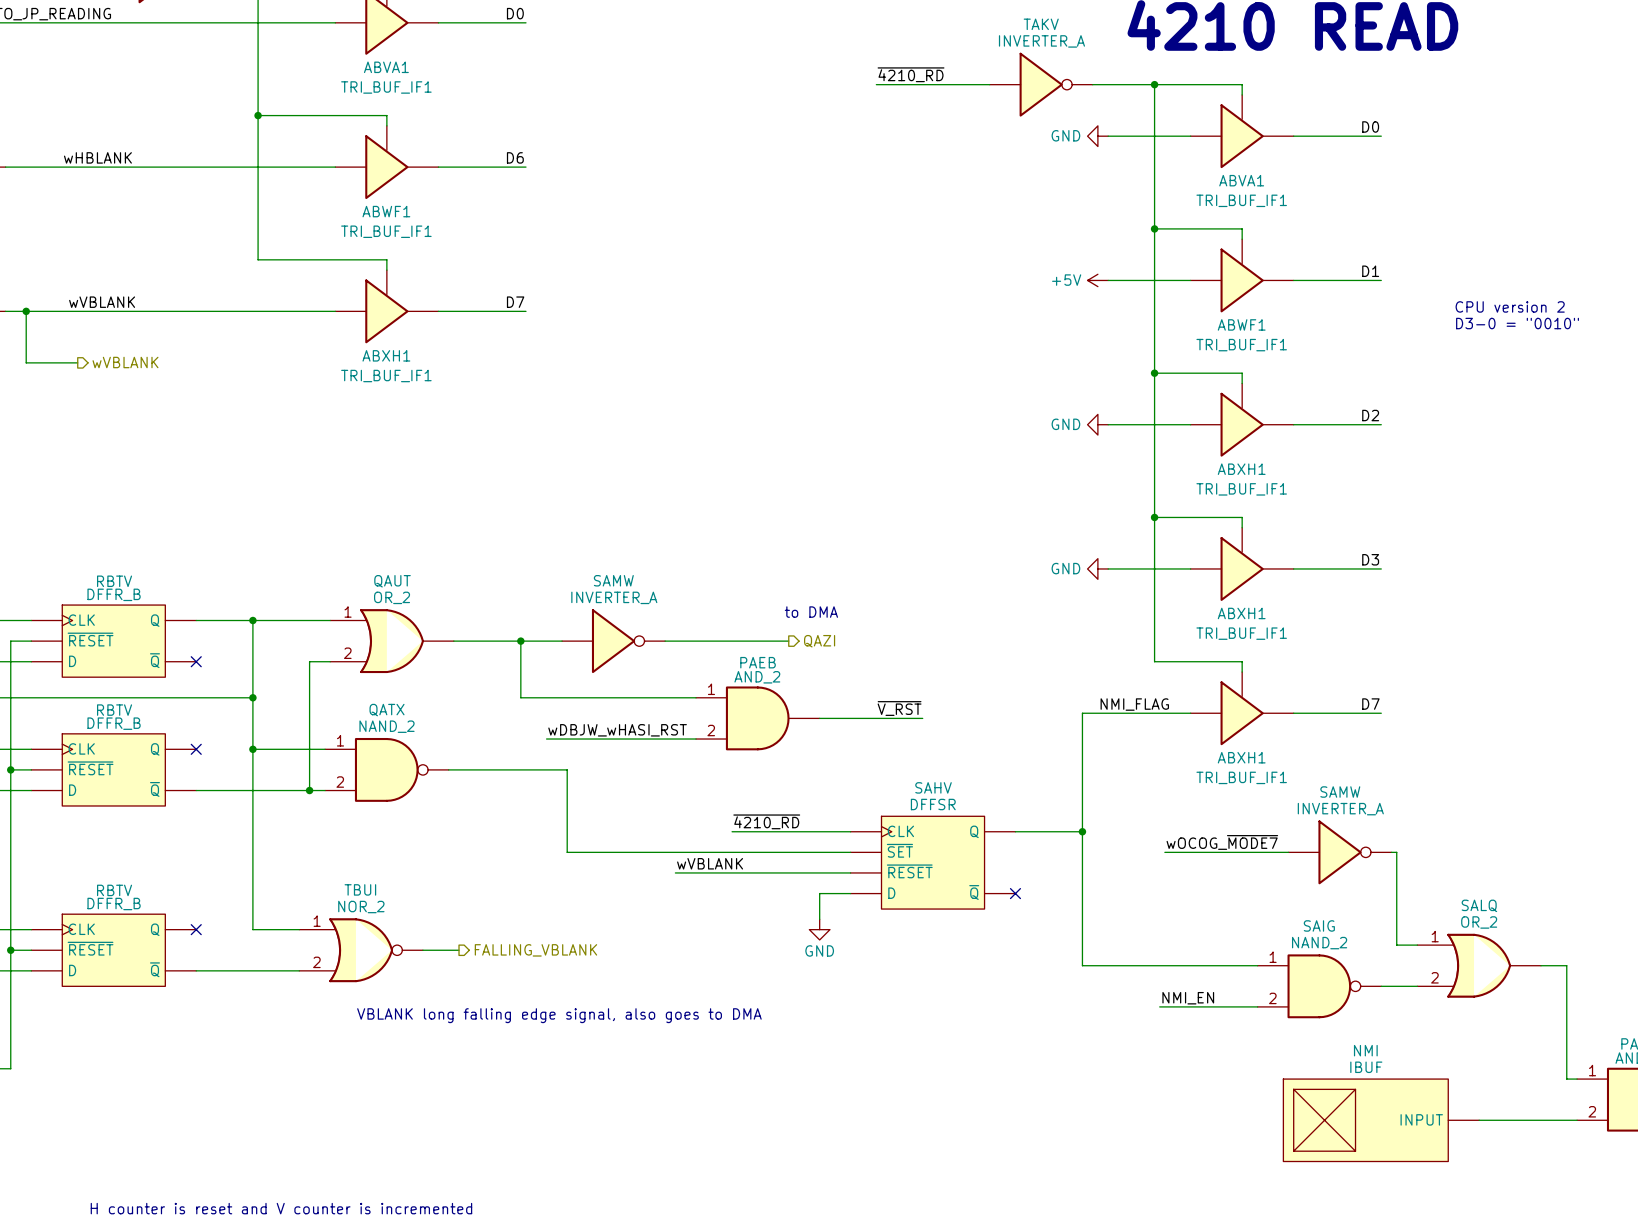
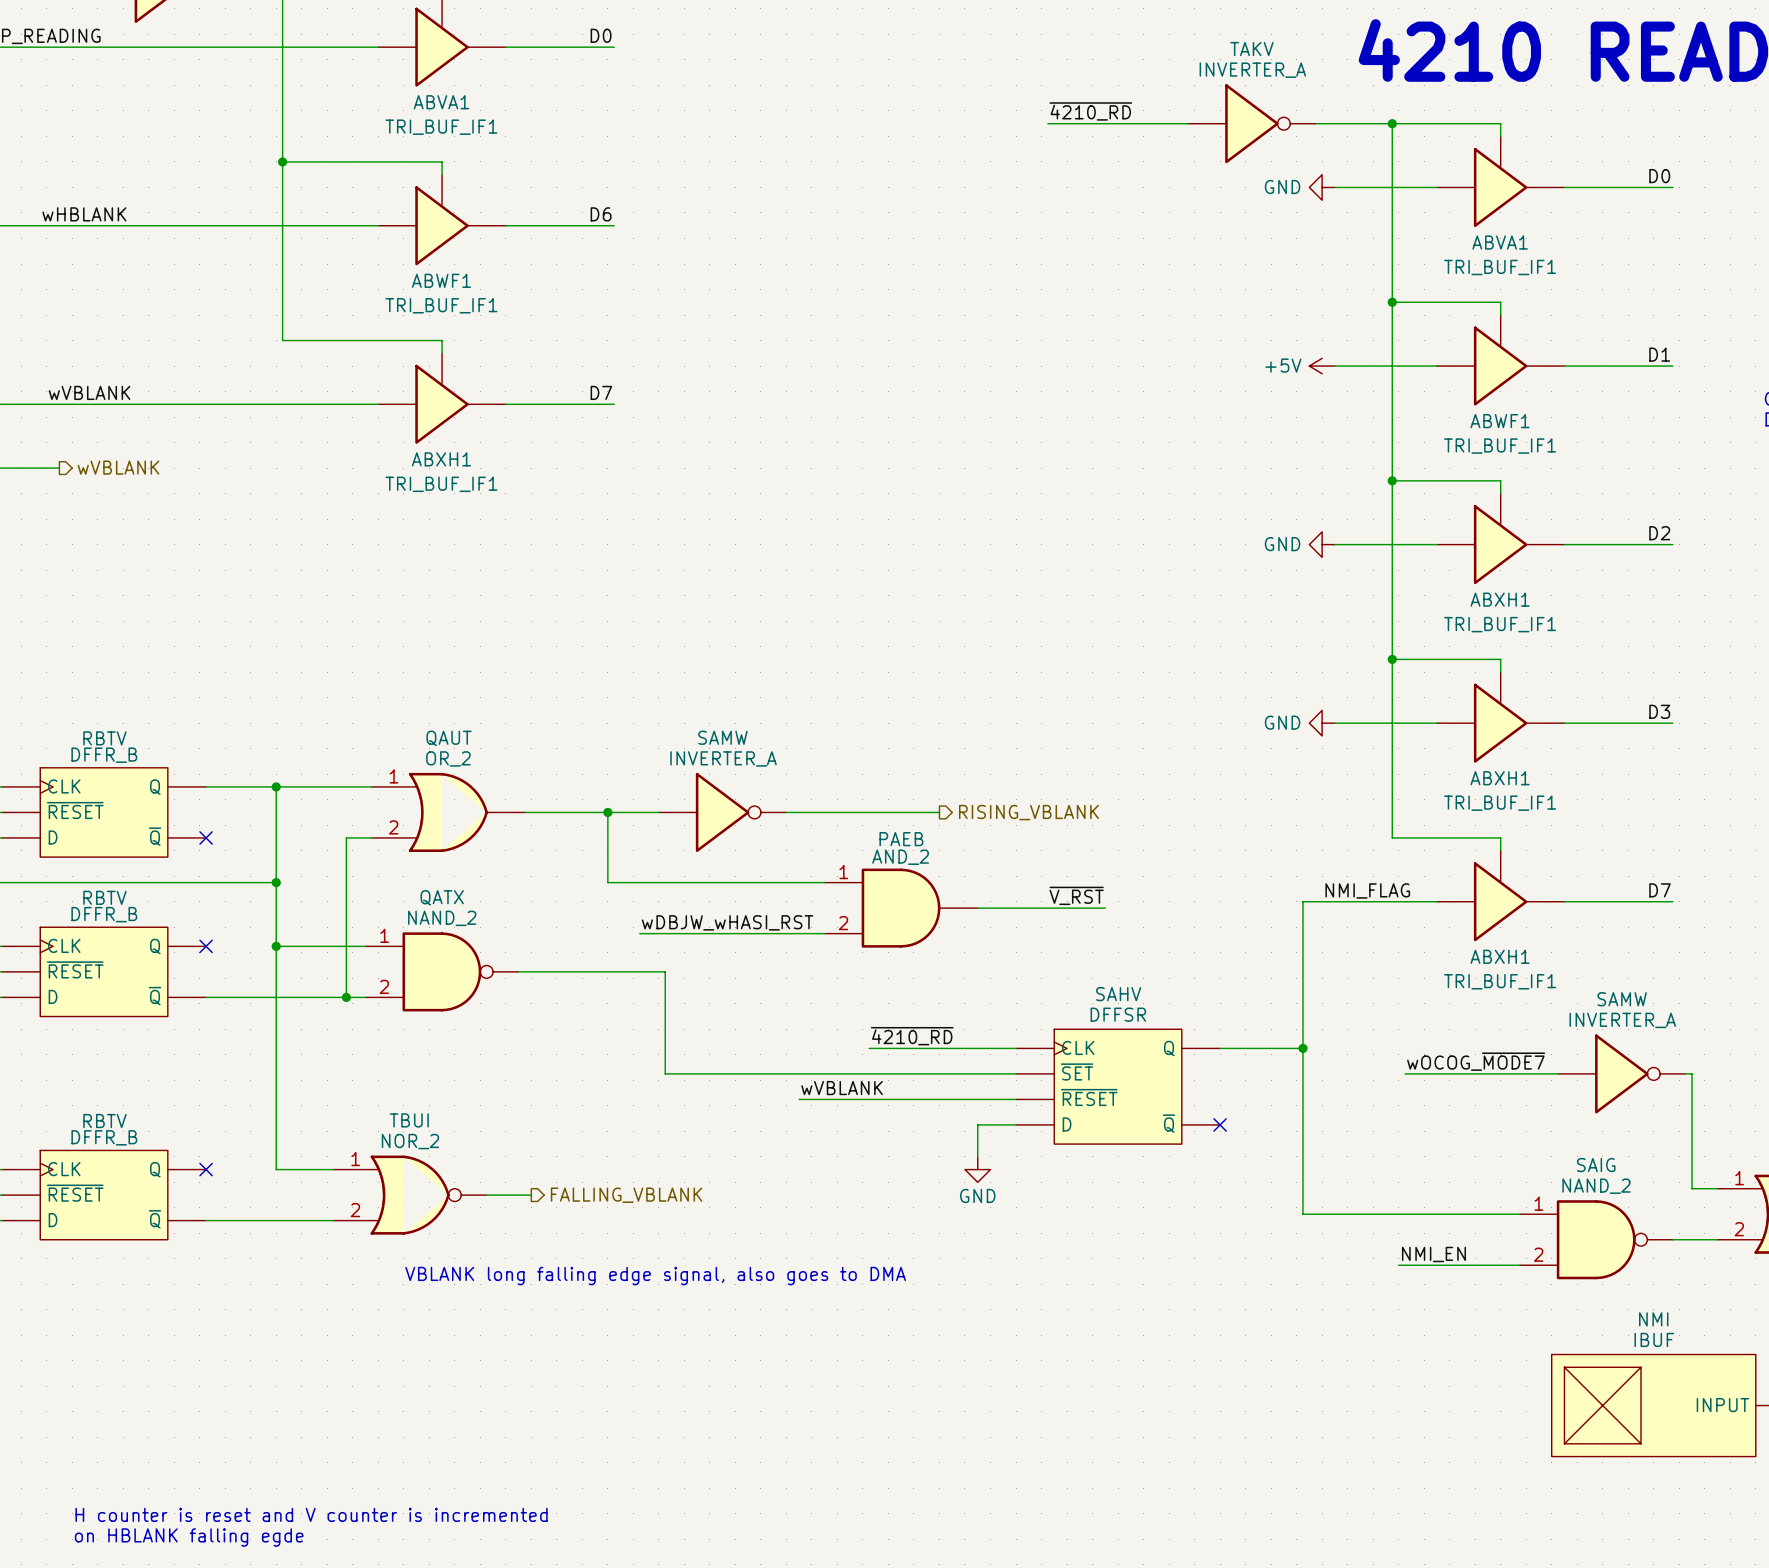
text: to DMA (811, 612) -> none
hierarchical label: QAZI (819, 641) -> RISING_VBLANK (1028, 812)

